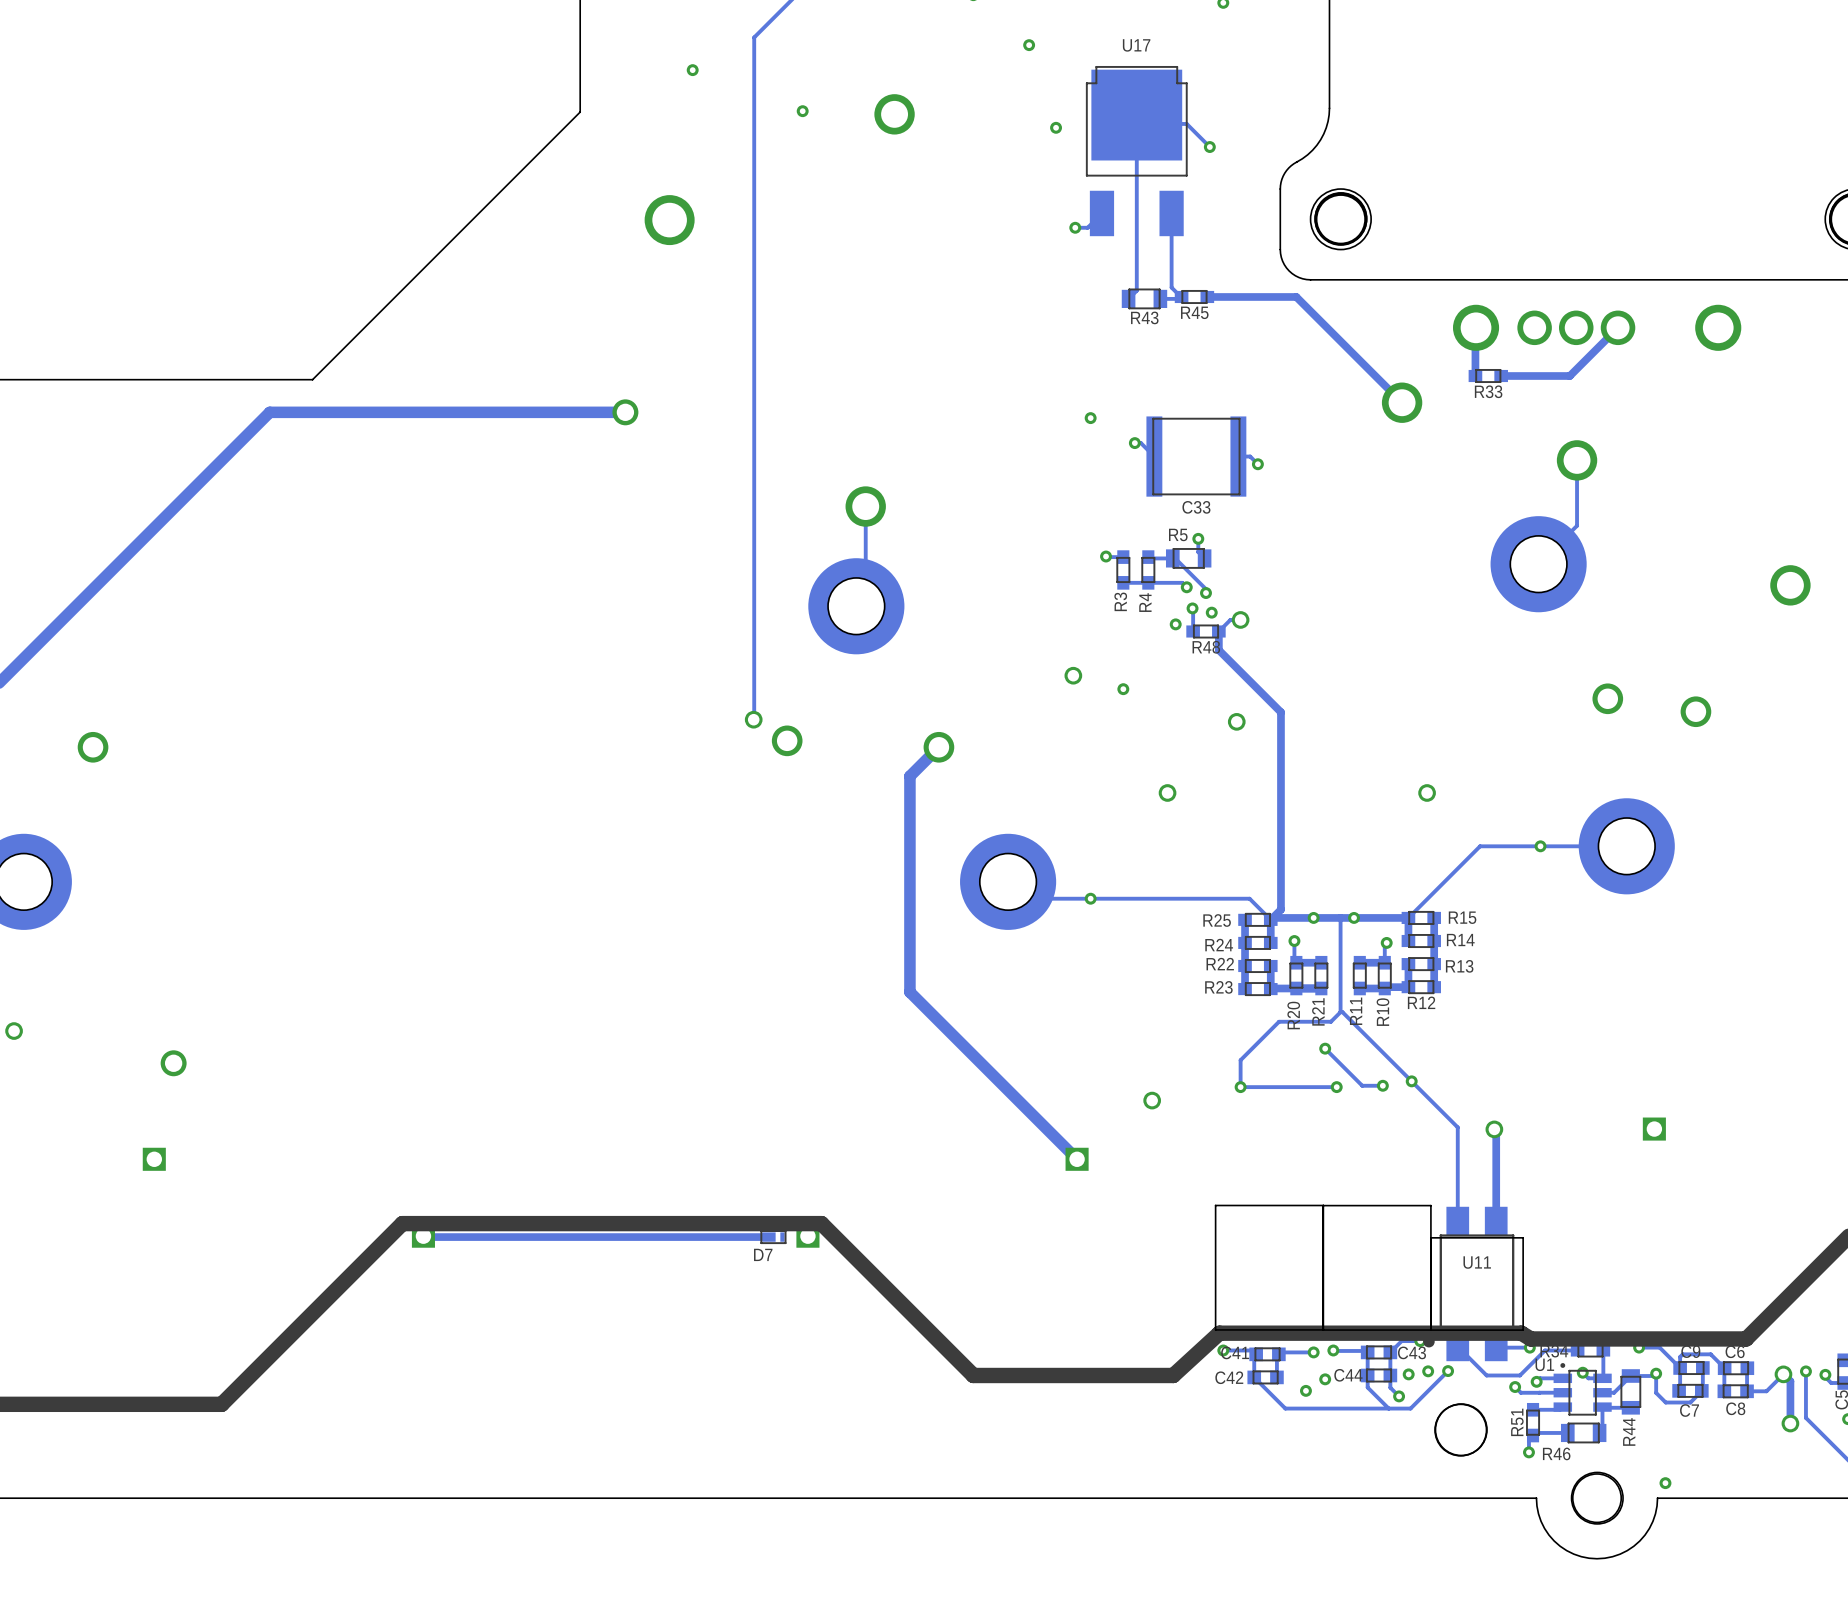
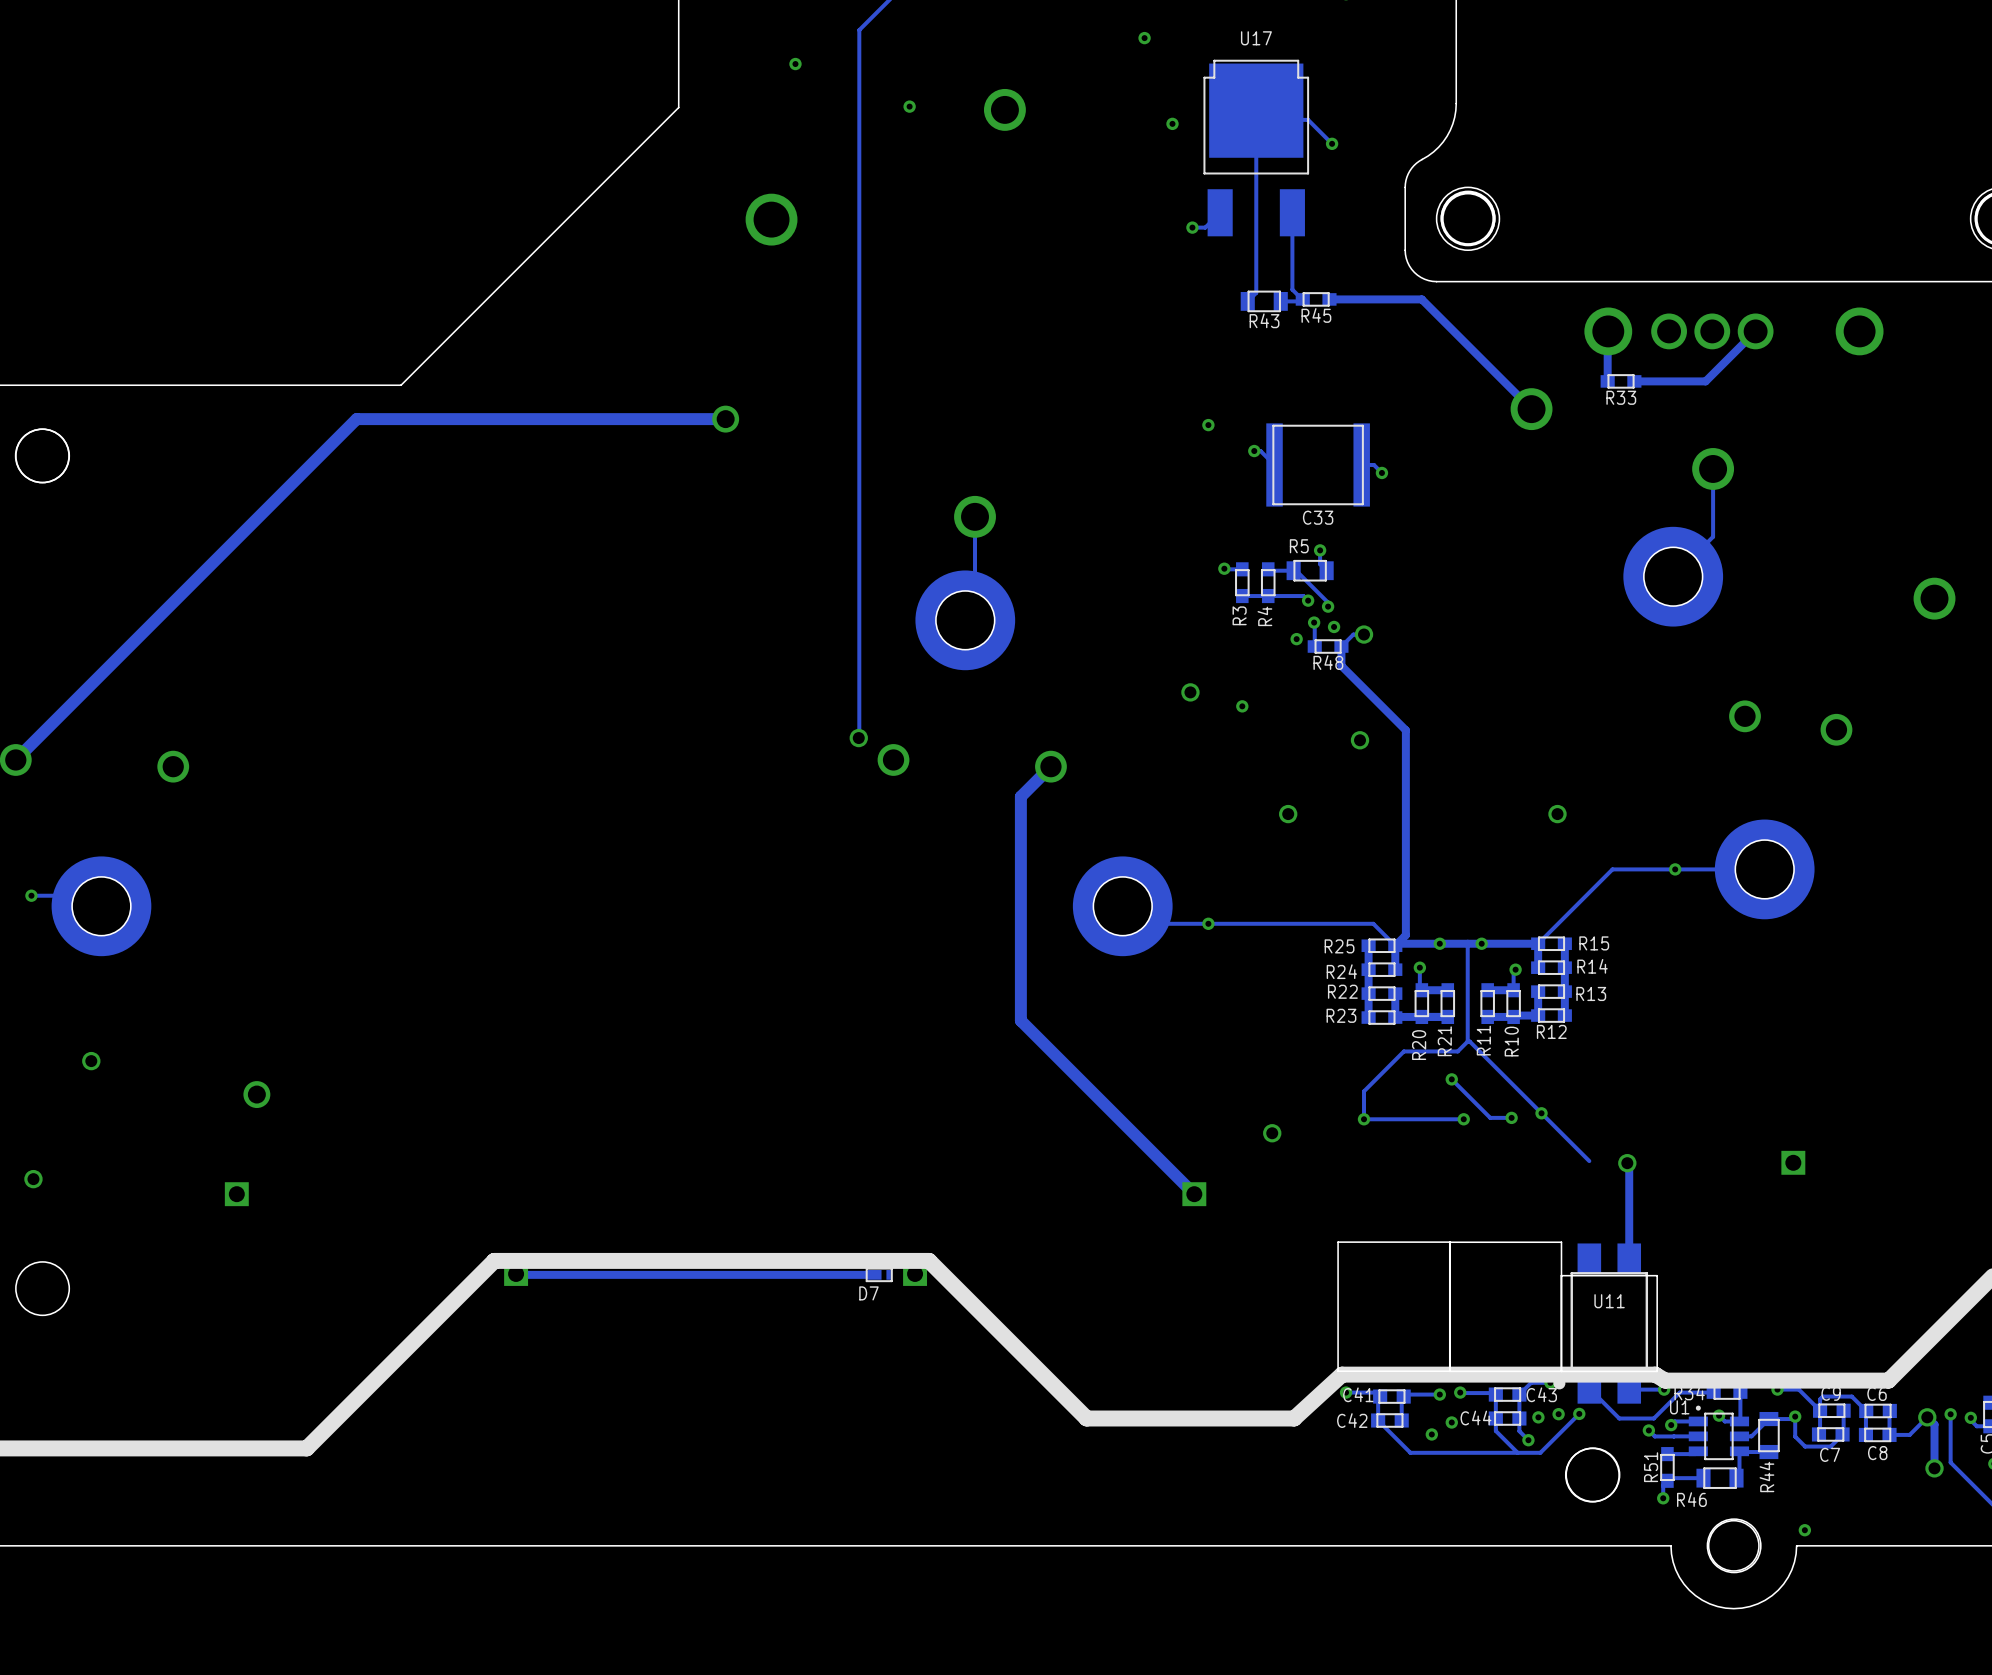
track: (1457, 1127) (1457, 1221) -> none

